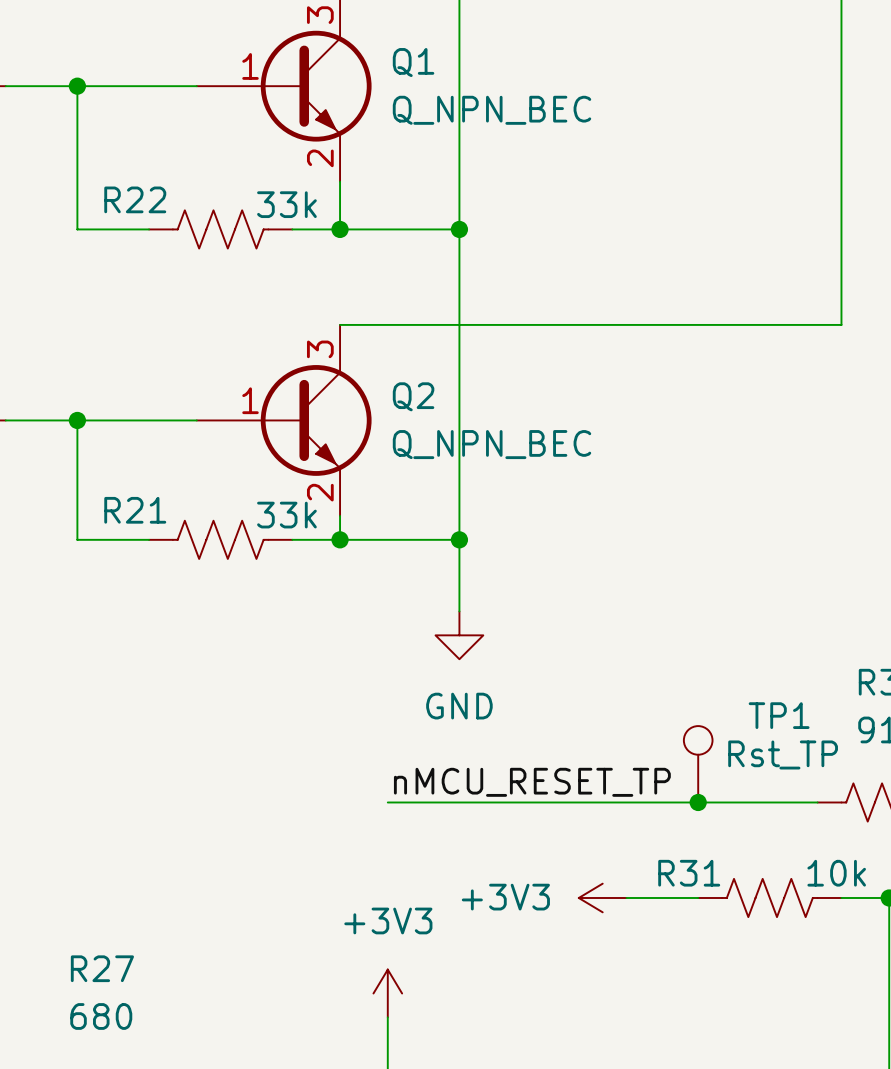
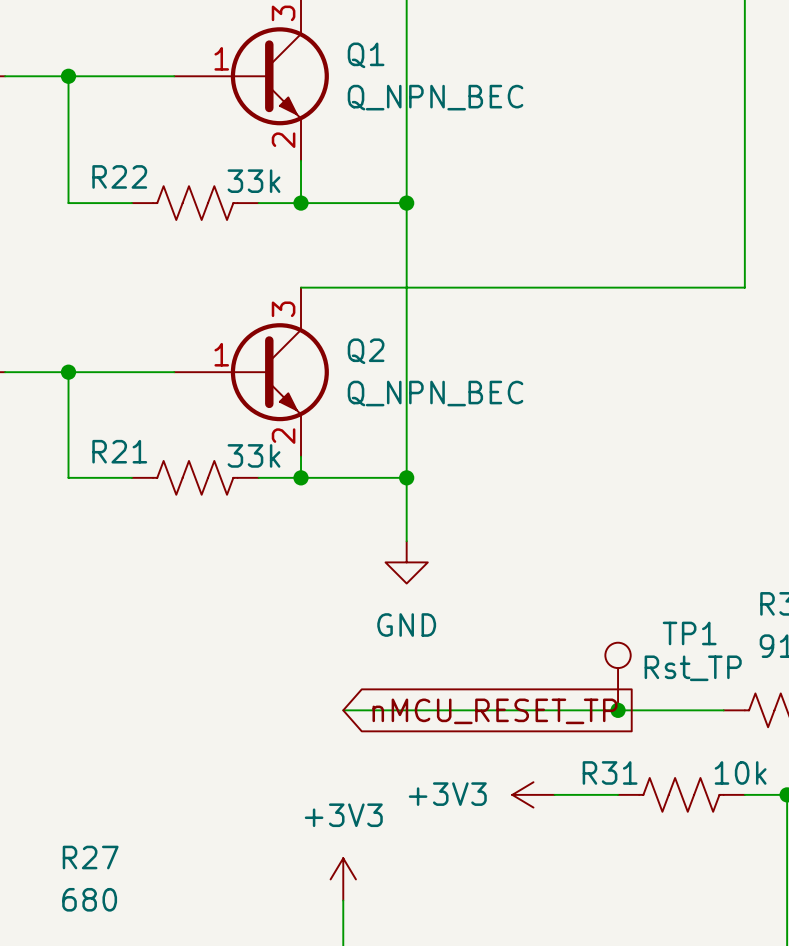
label: nMCU_RESET_TP (532, 782) -> none
global label: none -> nMCU_RESET_TP (495, 711)

